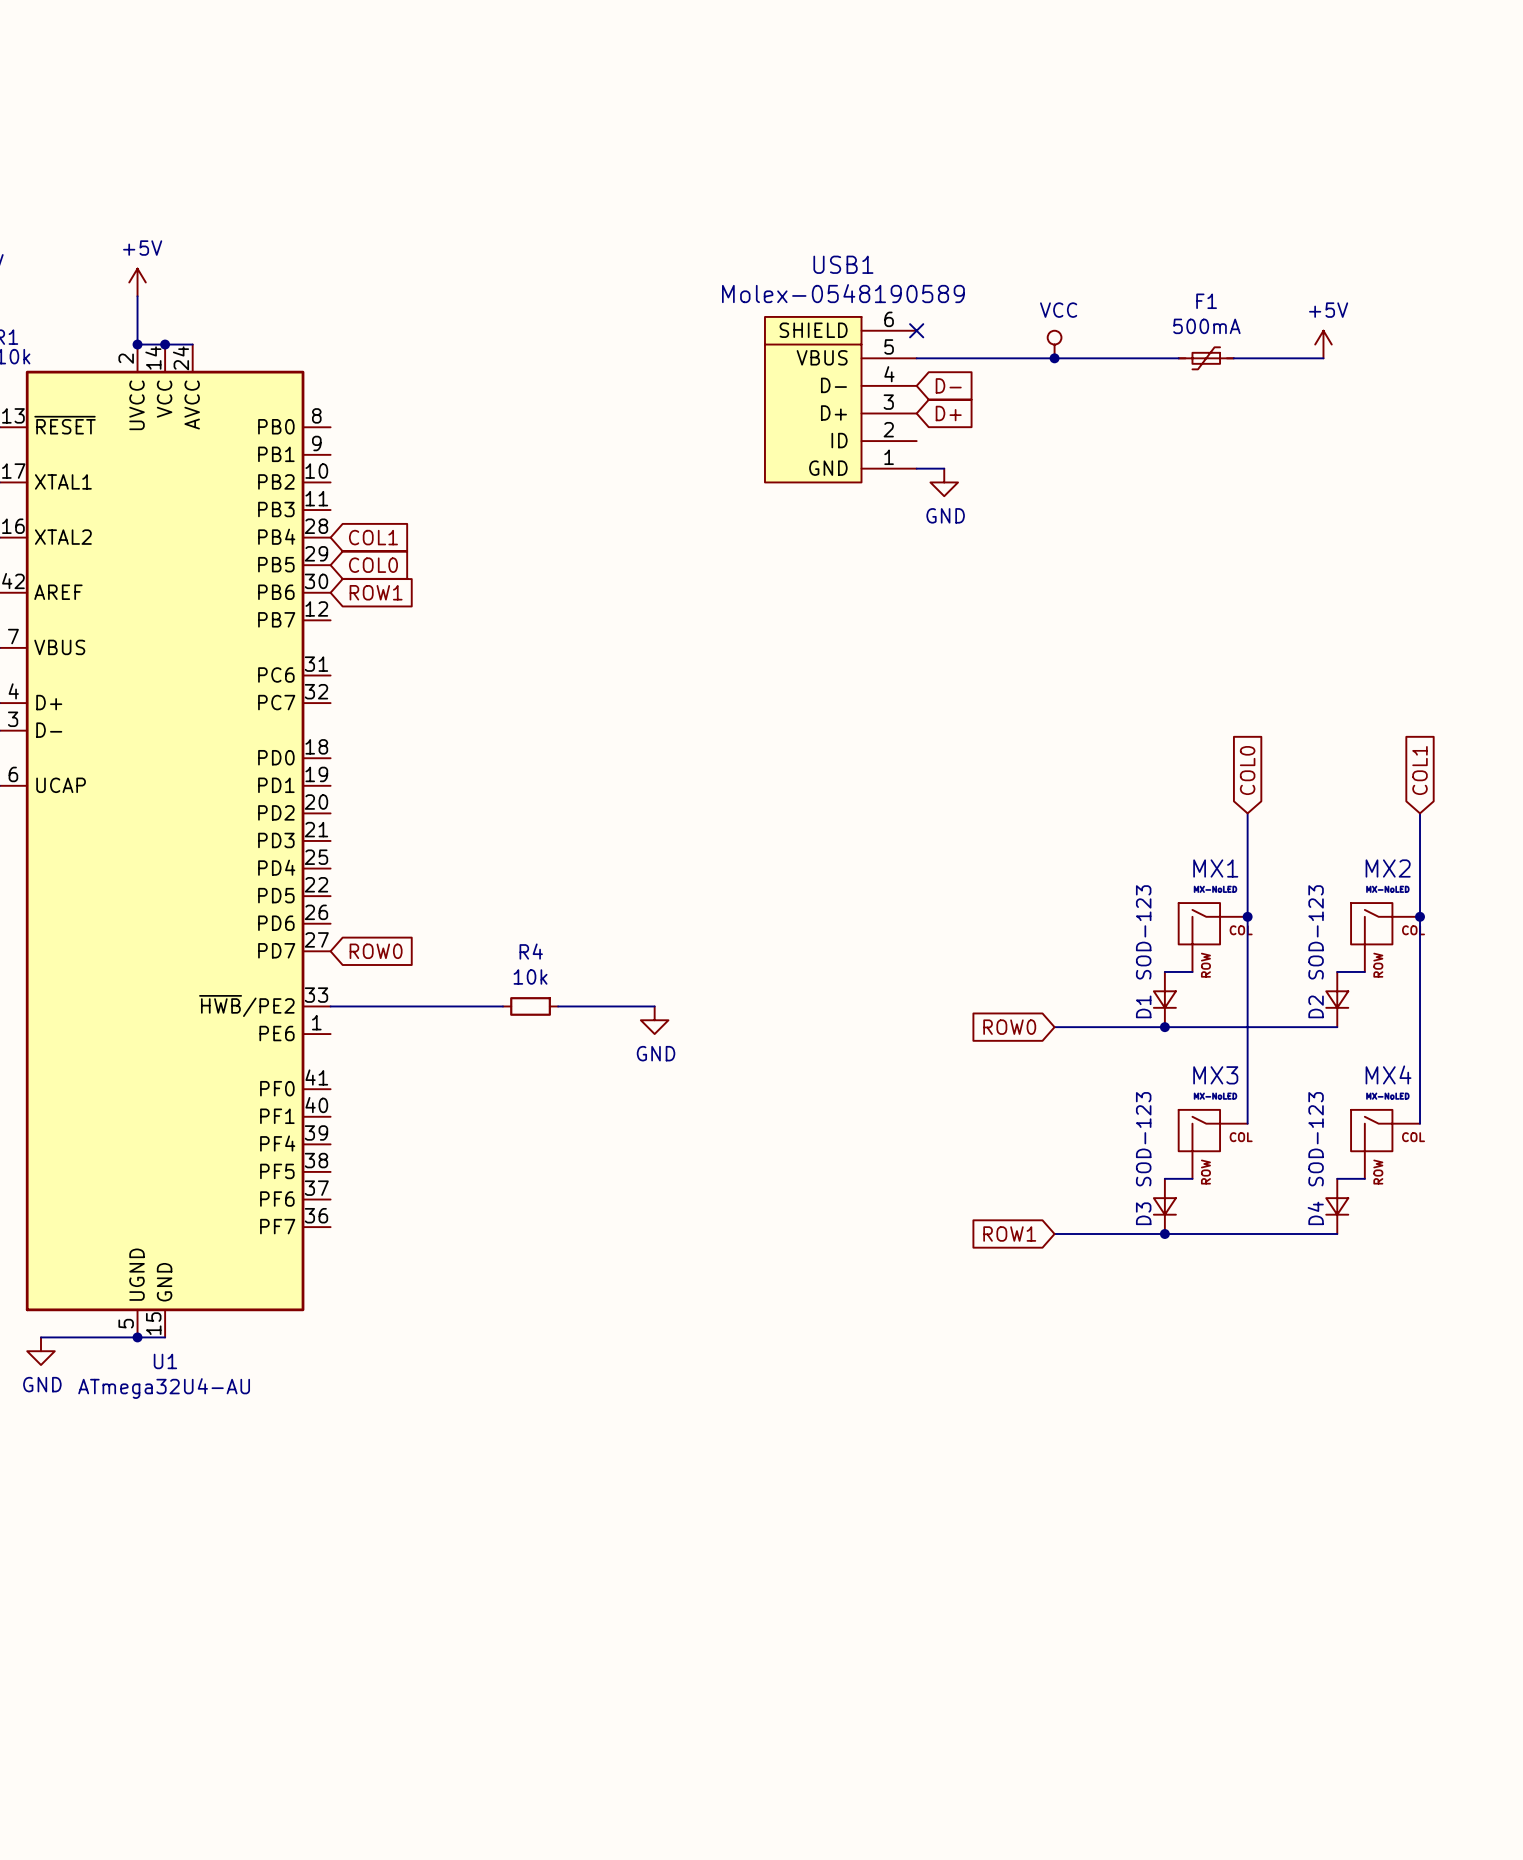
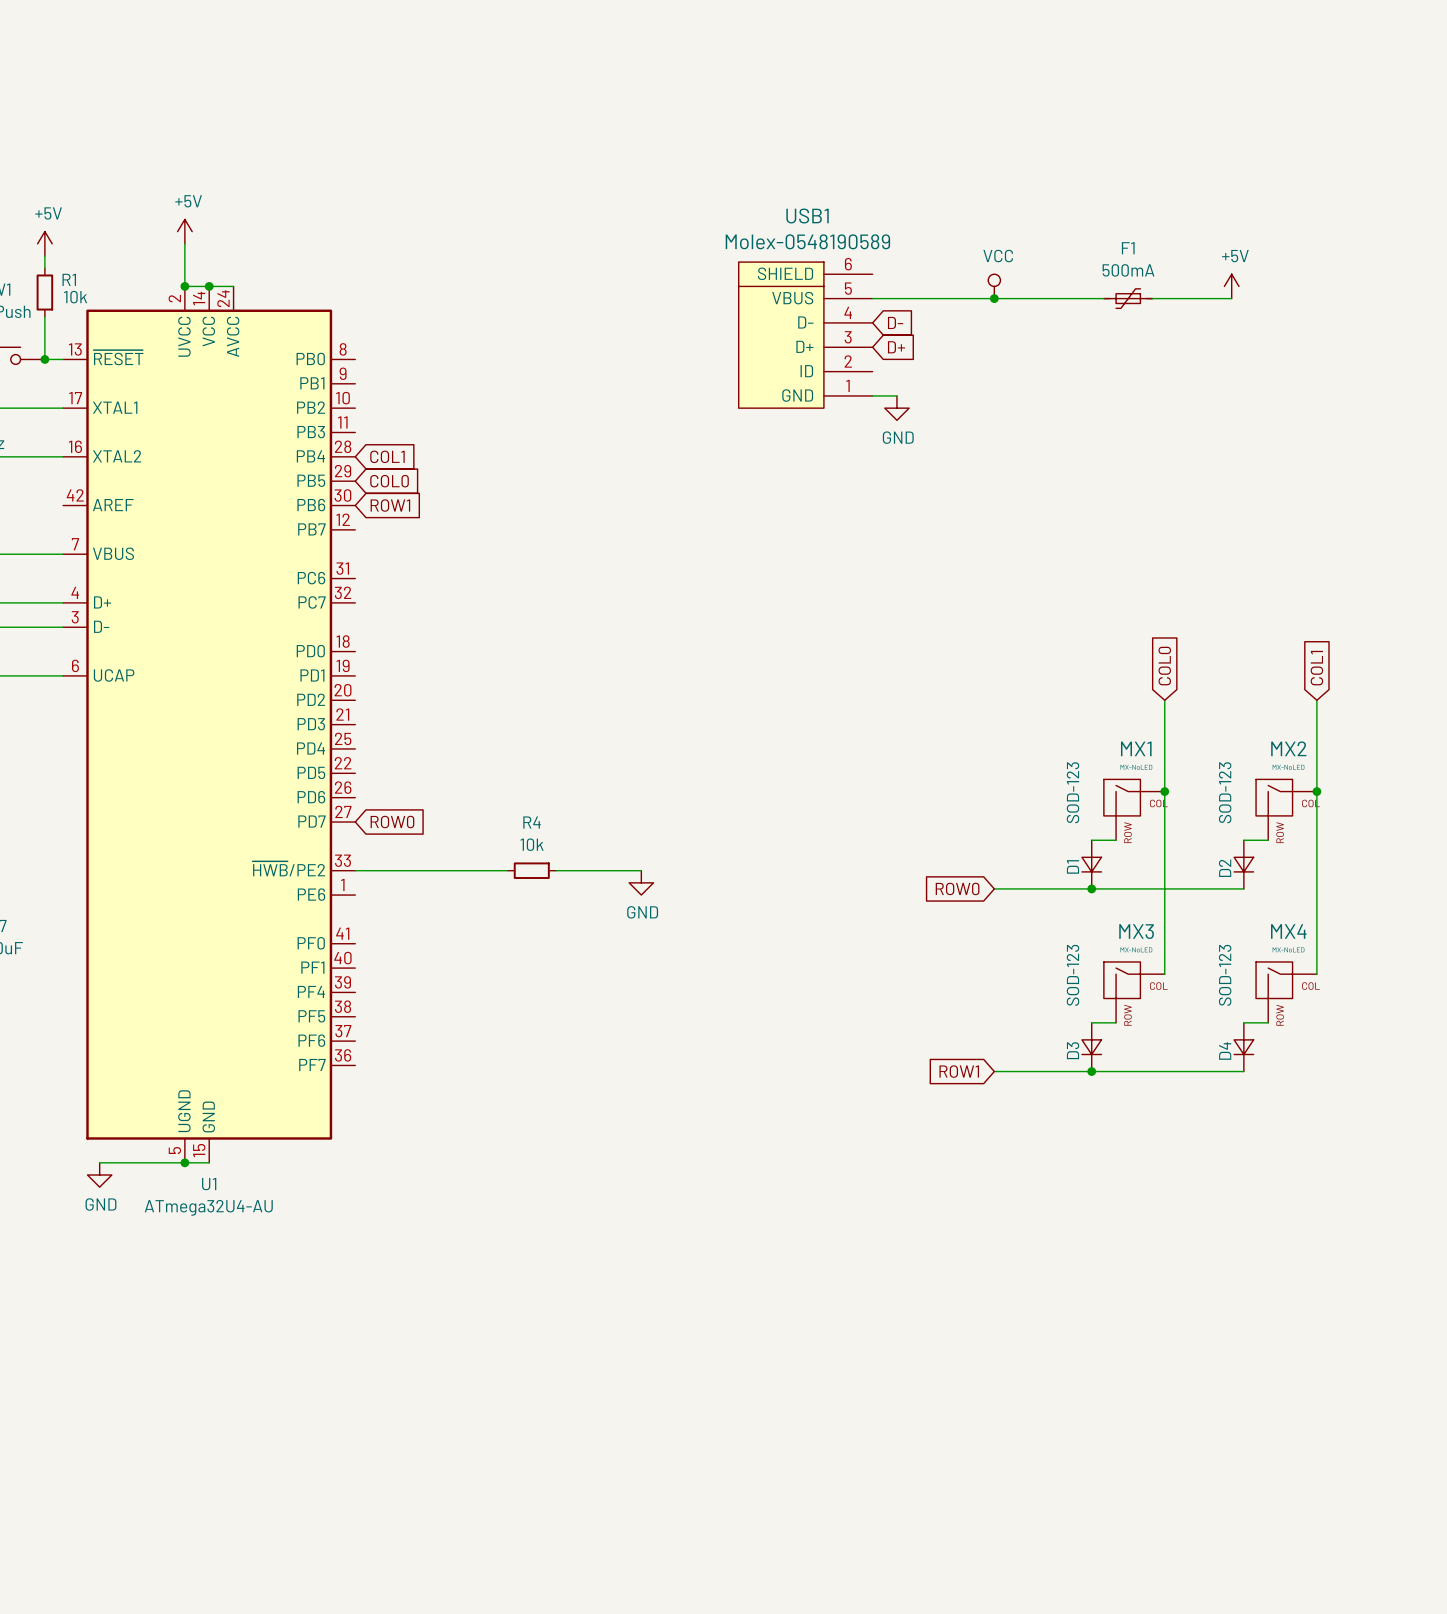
no-connect mark: (916, 330) -> none

